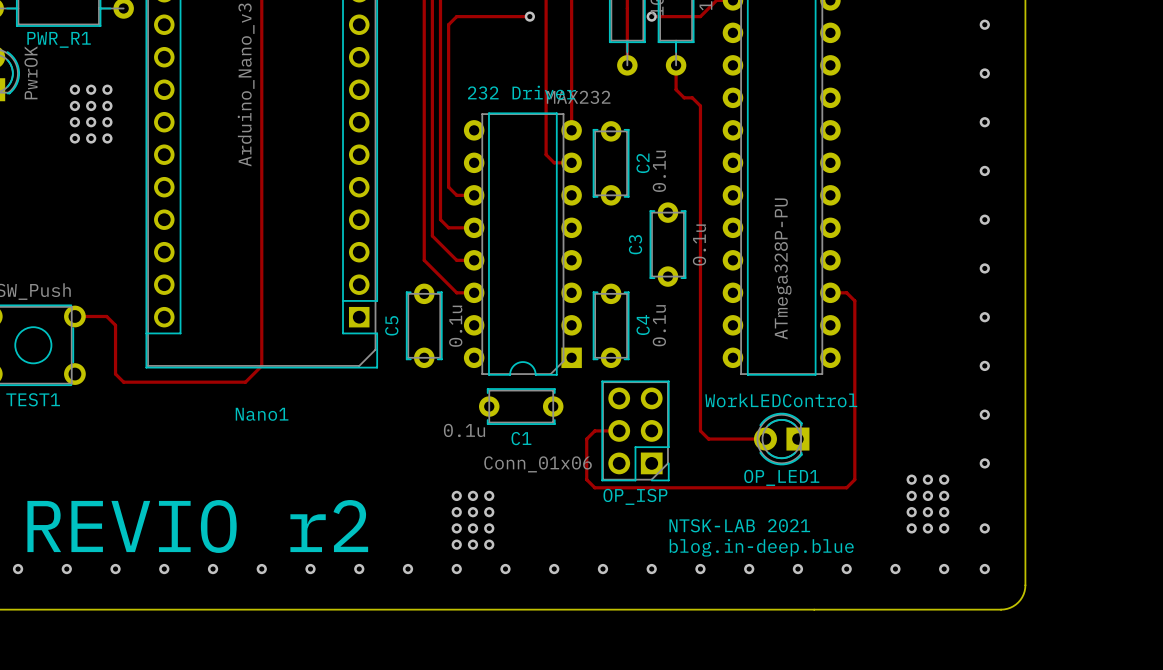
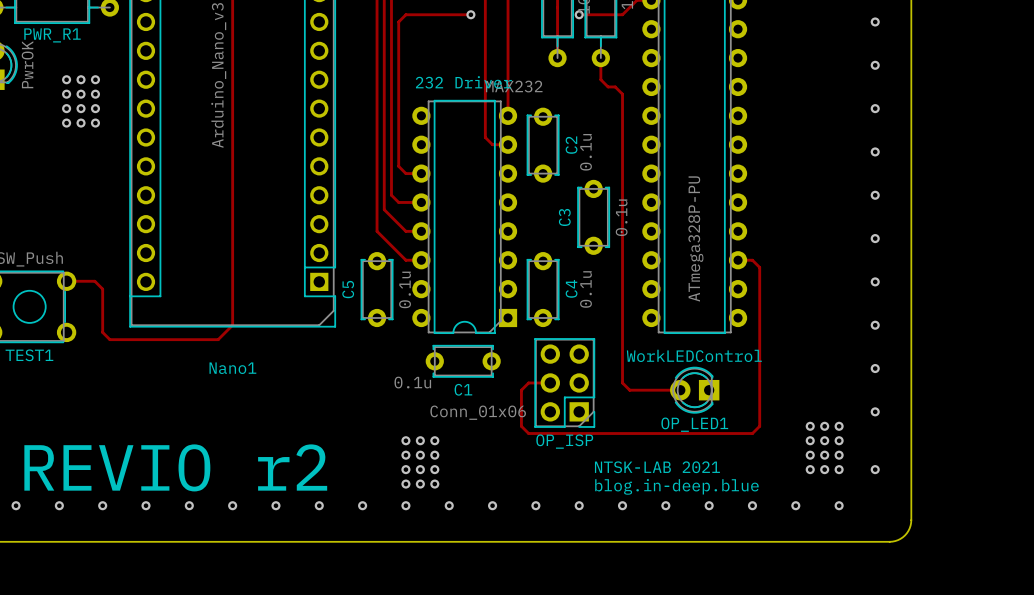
via: (984, 569) -> none

